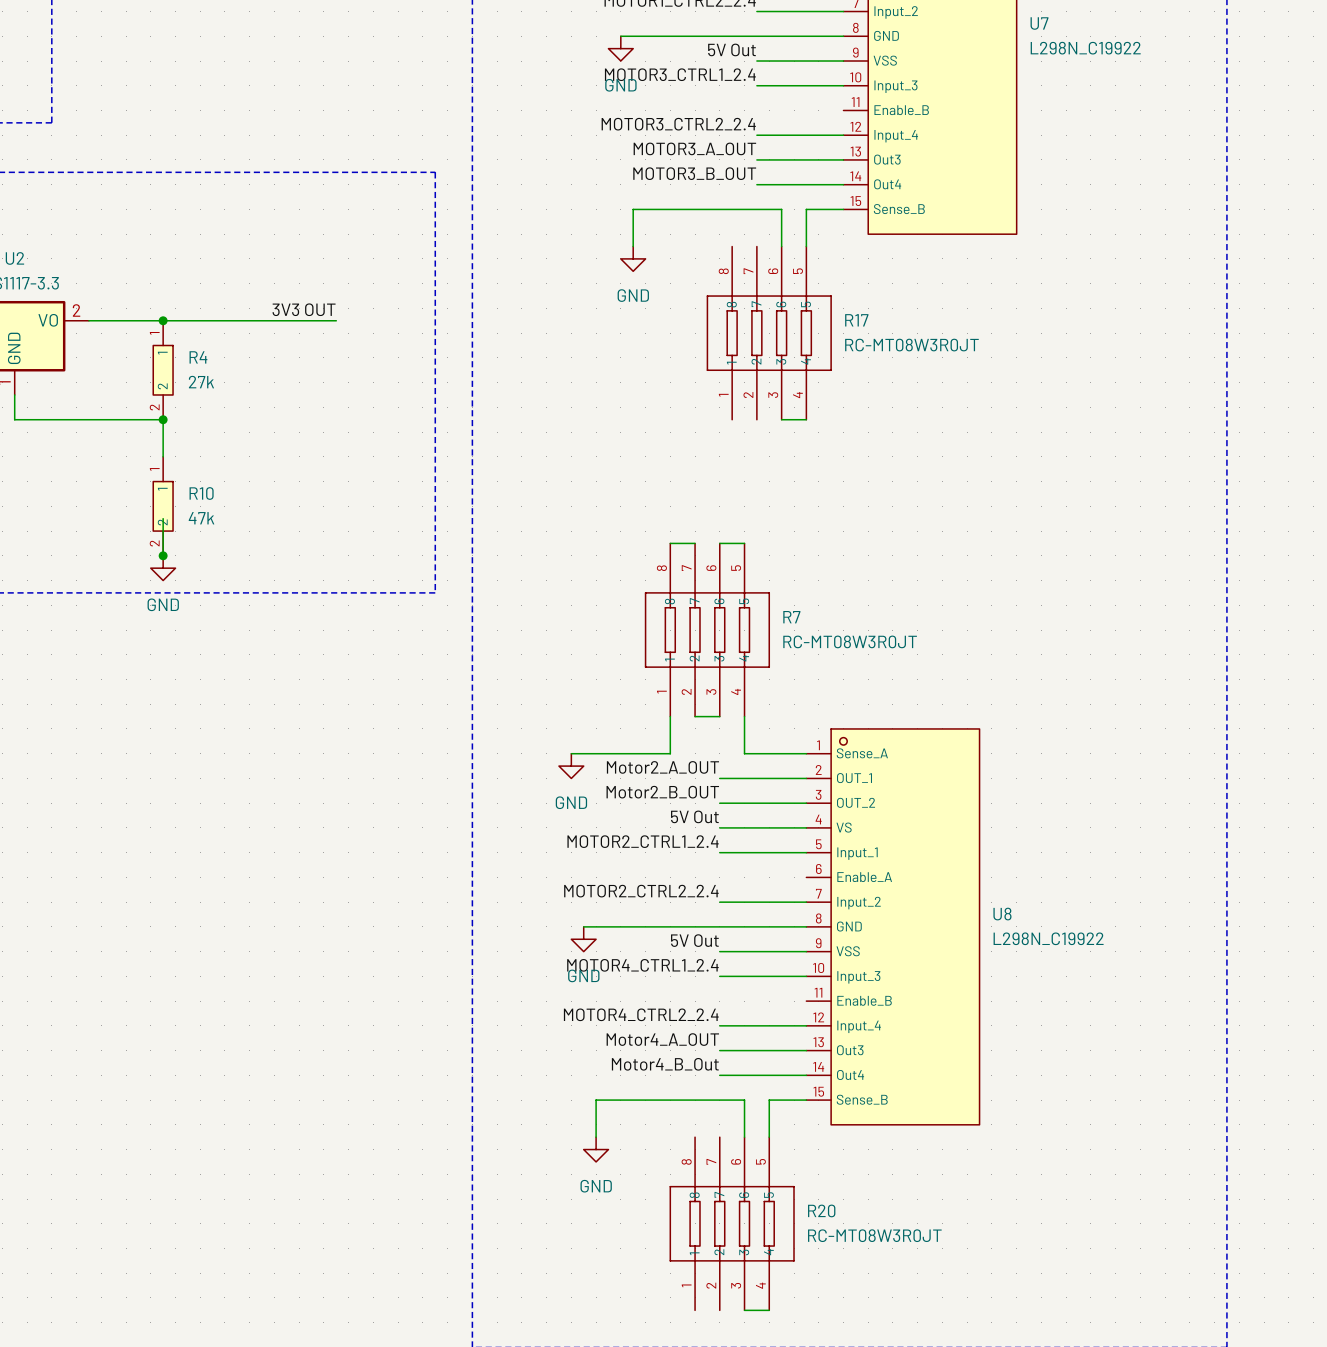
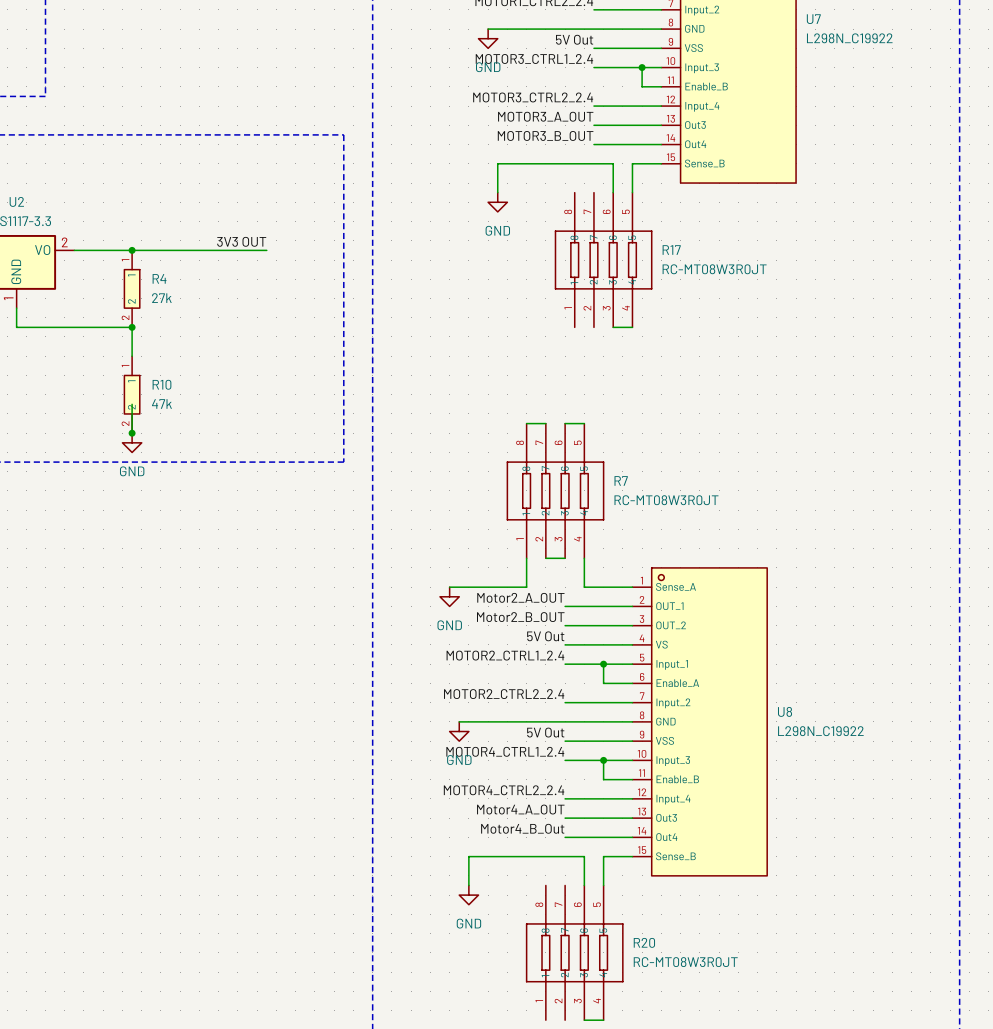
wire: none -> (642, 67) (642, 86) (661, 86)
junction: none -> (642, 67)
wire: none -> (603, 664) (603, 683) (632, 683)
junction: none -> (603, 664)
wire: none -> (603, 760) (603, 779) (632, 779)
junction: none -> (603, 760)

